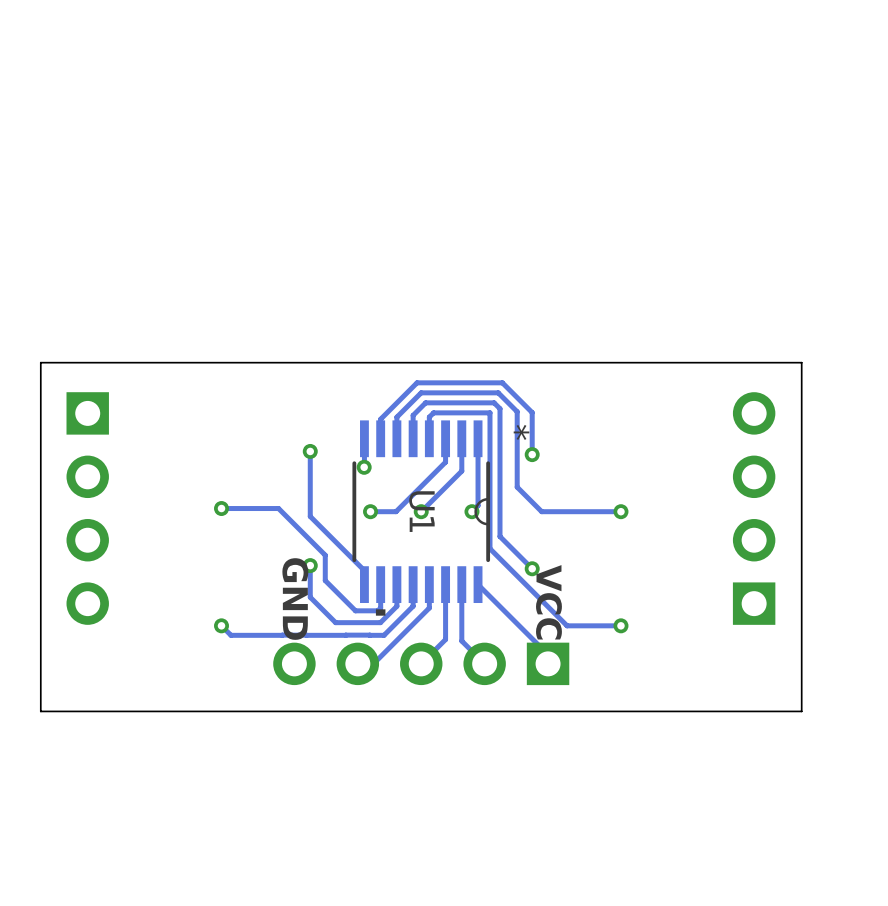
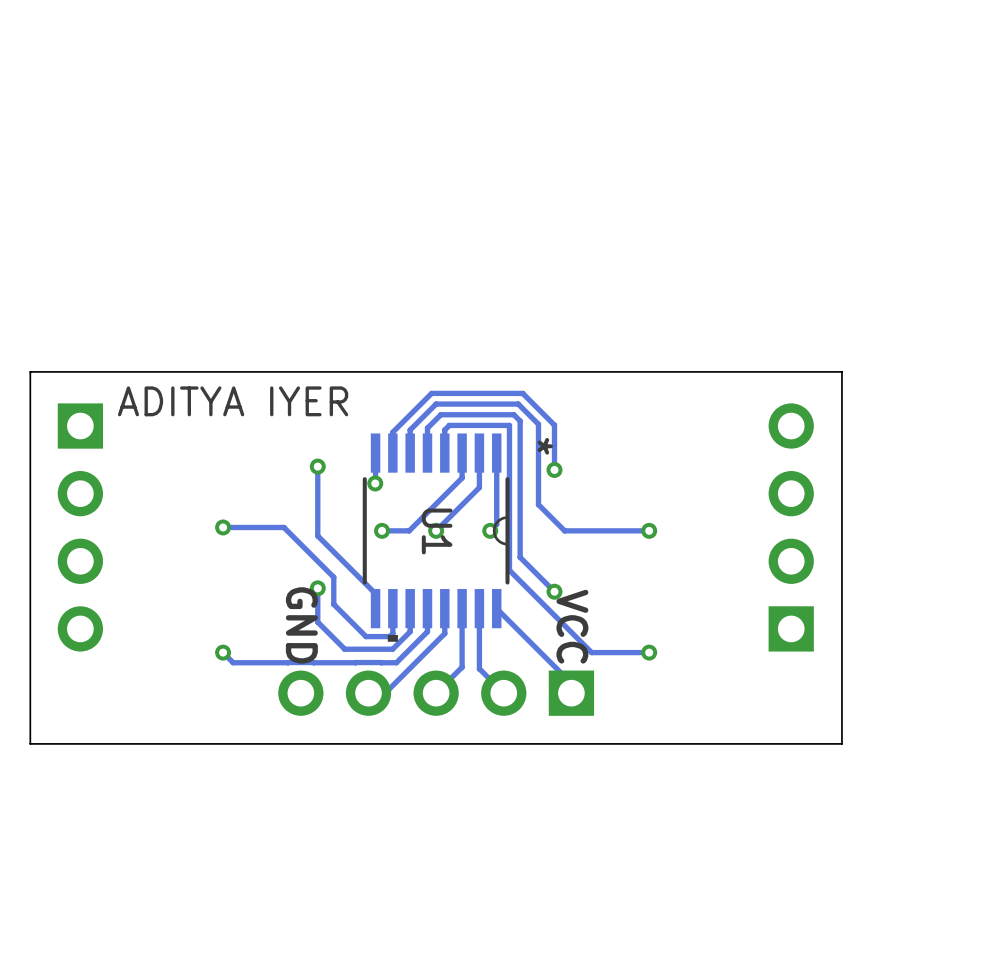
text: none -> ADITYA IYER (233, 401)

